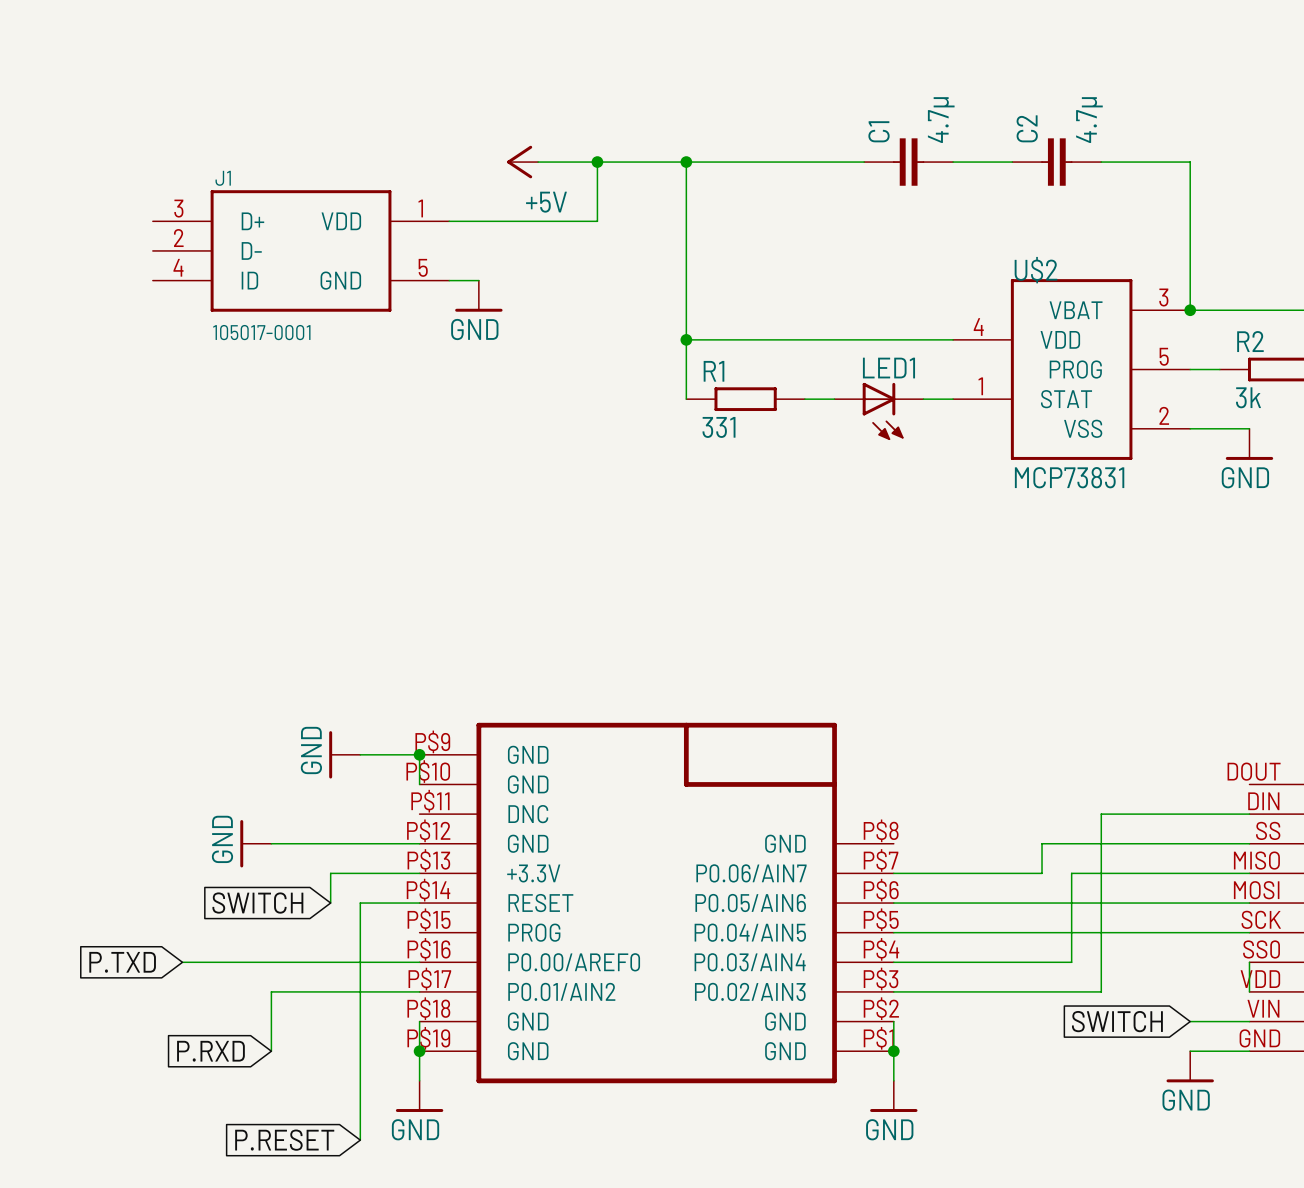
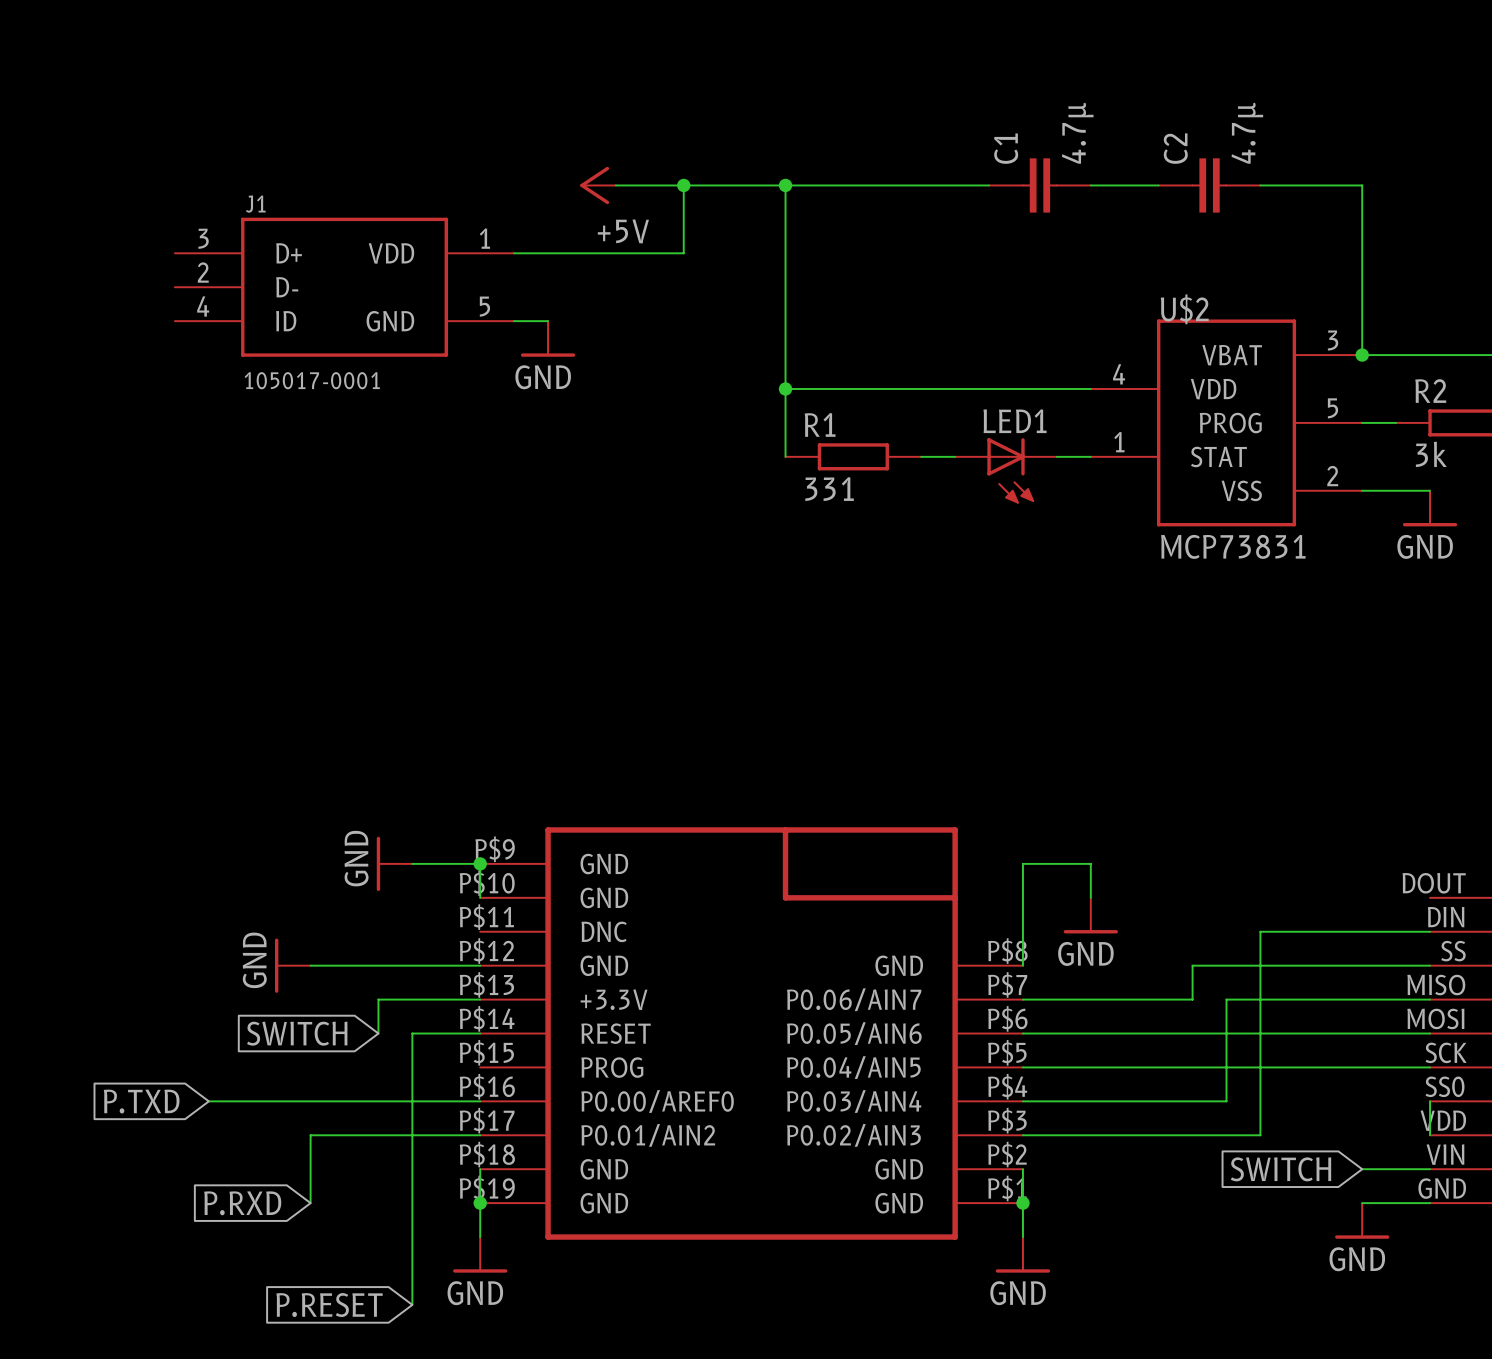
wire: none -> (1090, 897) (1090, 863) (1022, 863) (1022, 965)
power symbol: none -> GND (1090, 915)

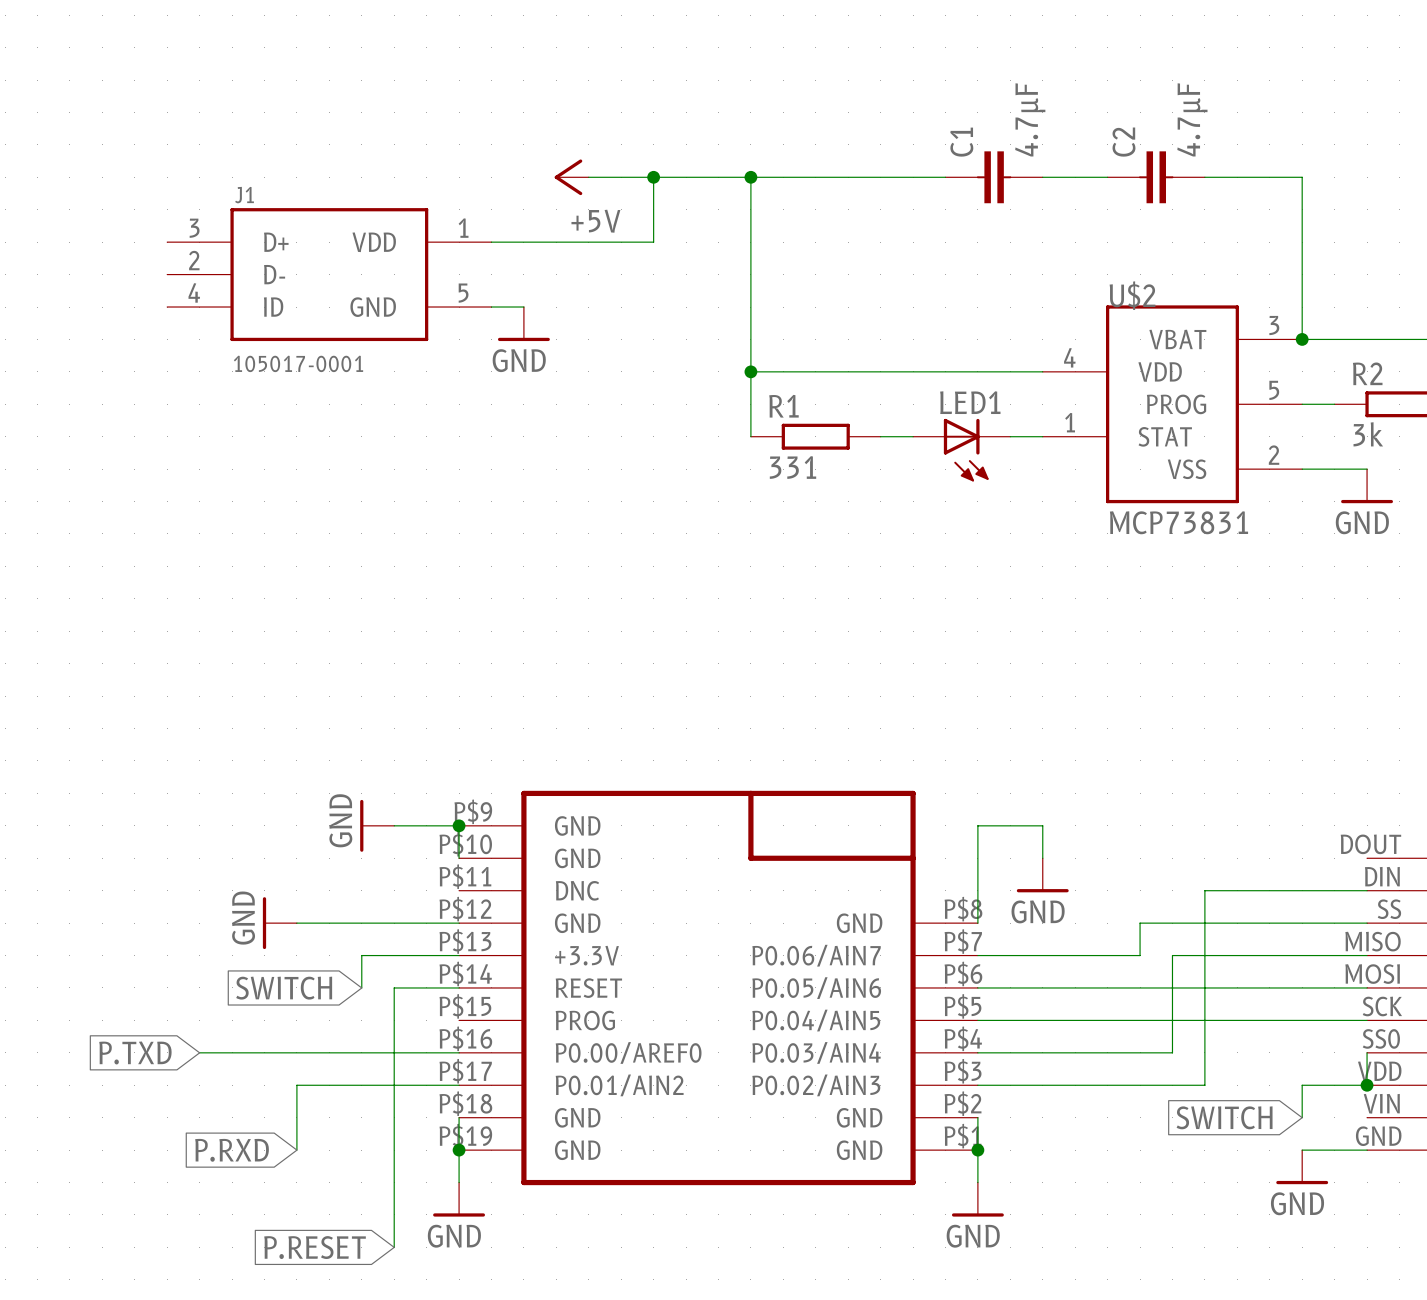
C1 value: 4.7µ (1077, 133) -> 4.7µF (1030, 119)
C2 value: 4.7µ (1247, 133) -> 4.7µF (1192, 119)
junction: none -> (1367, 1085)
wire: (1362, 1169) (1430, 1169) -> (1302, 1117) (1302, 1085) (1367, 1085)

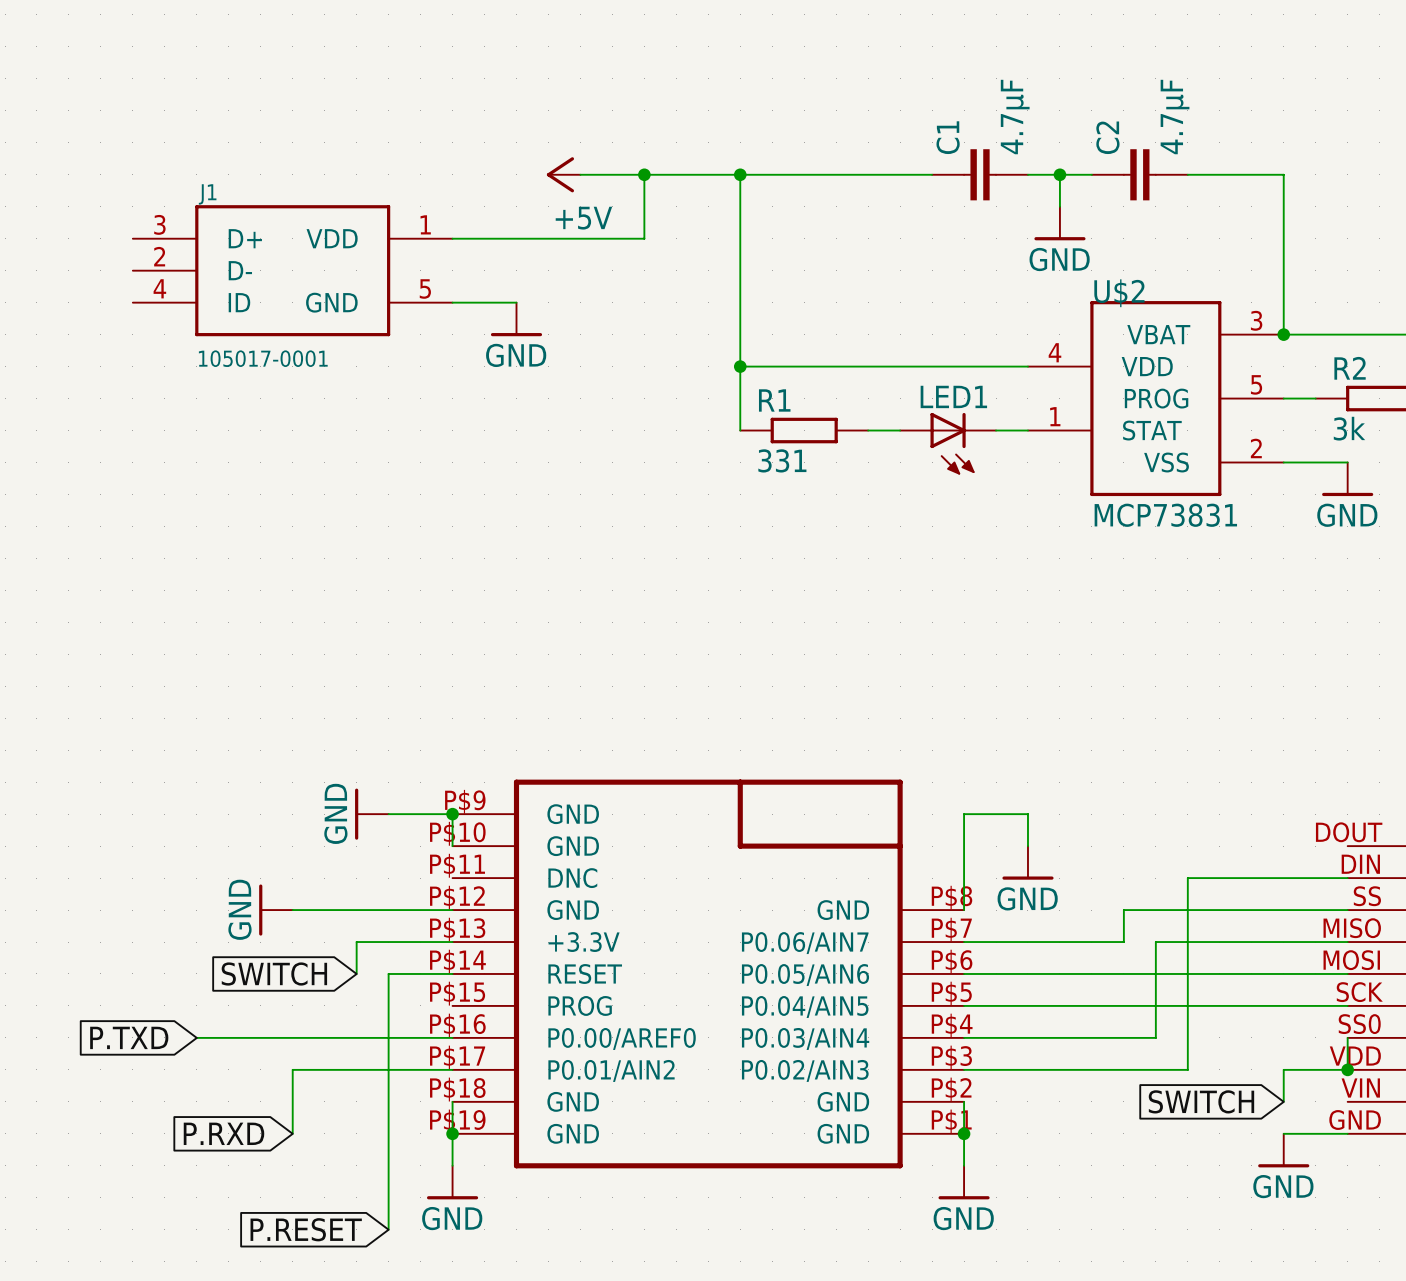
wire: none -> (1059, 174) (1059, 206)
junction: none -> (1059, 174)
power symbol: none -> GND (1059, 223)
J1 position: (329, 274) -> (292, 270)

